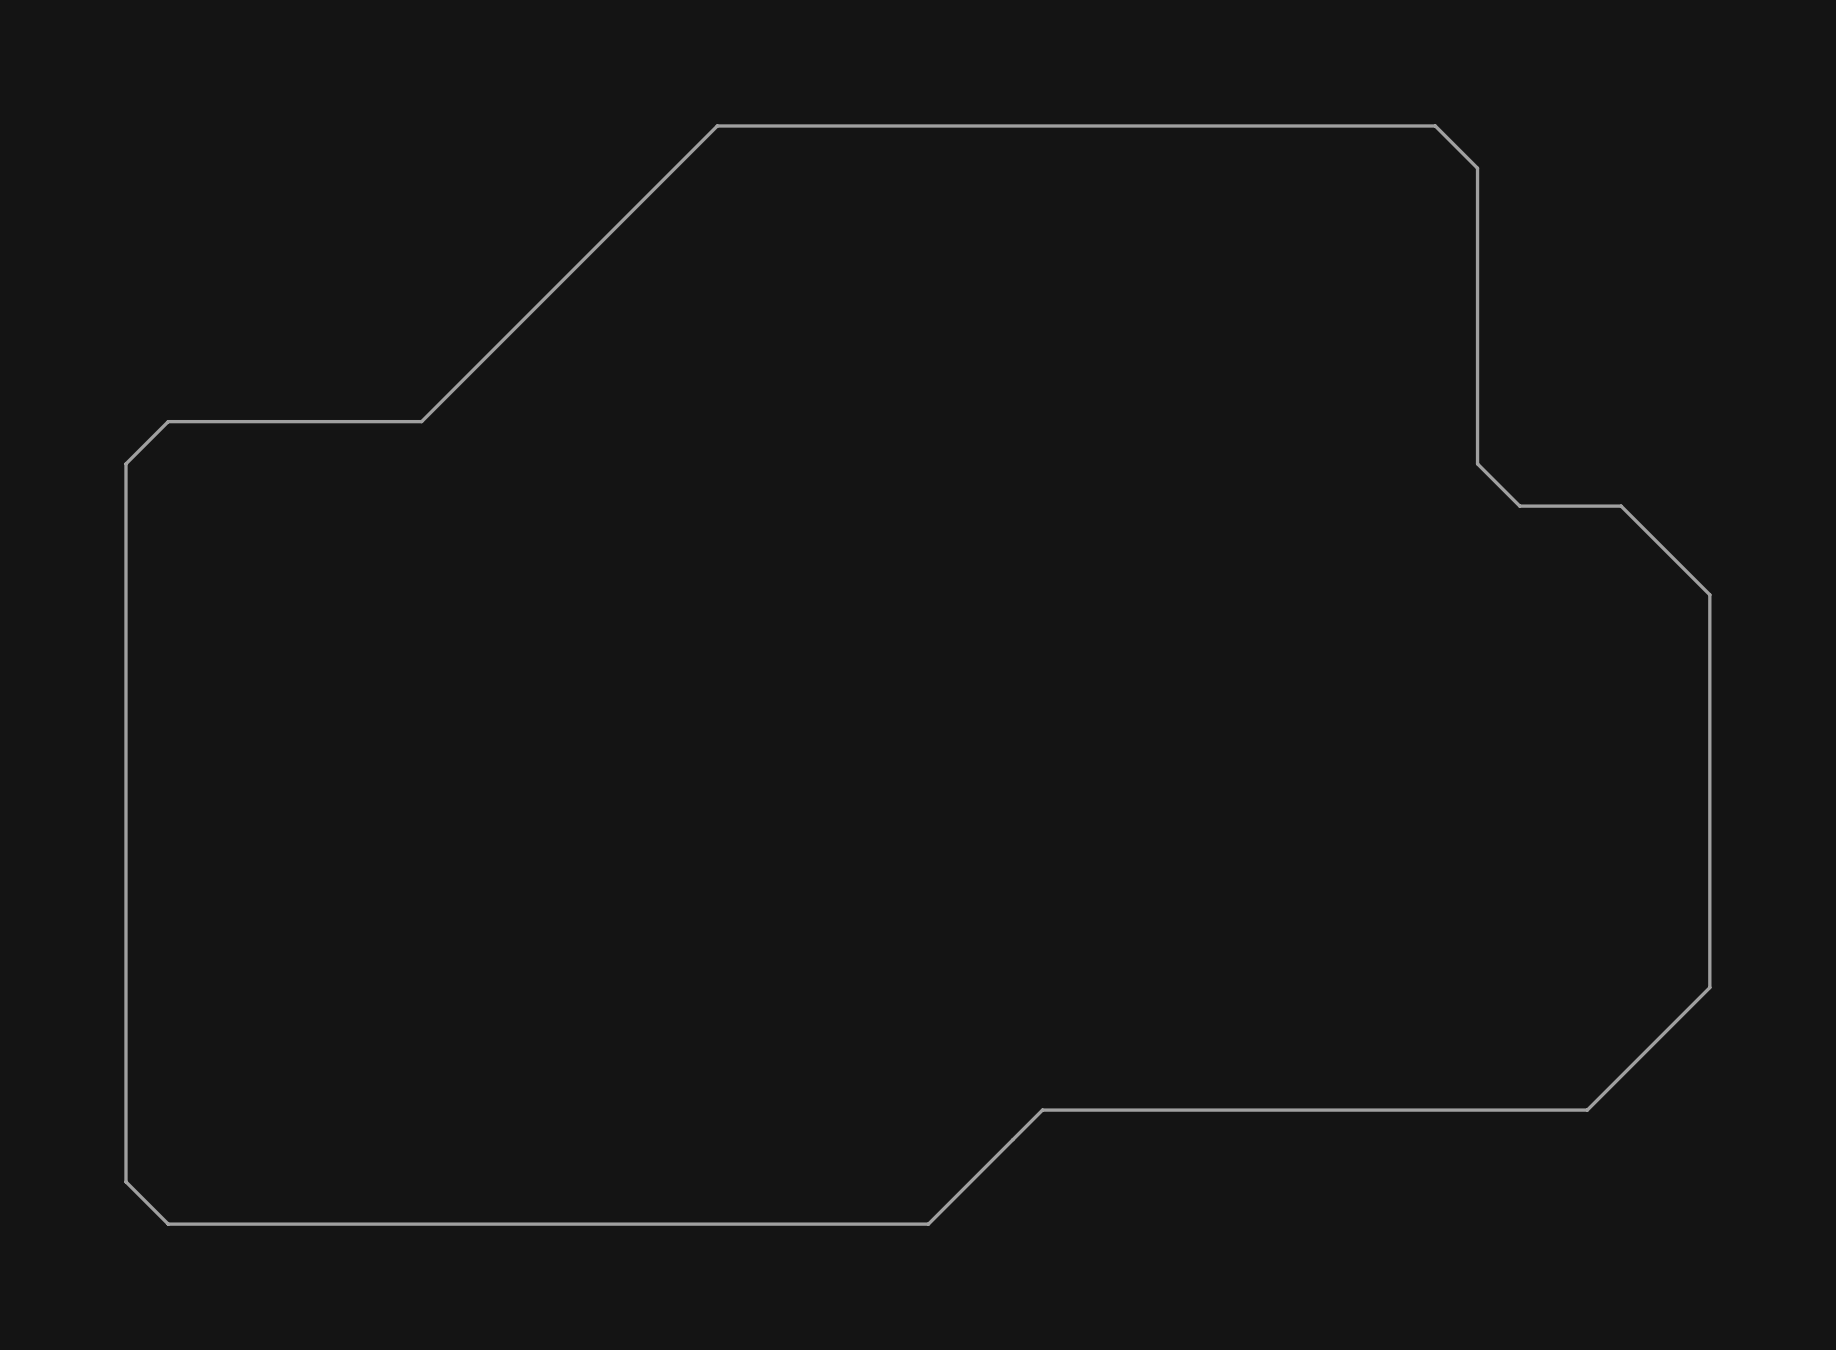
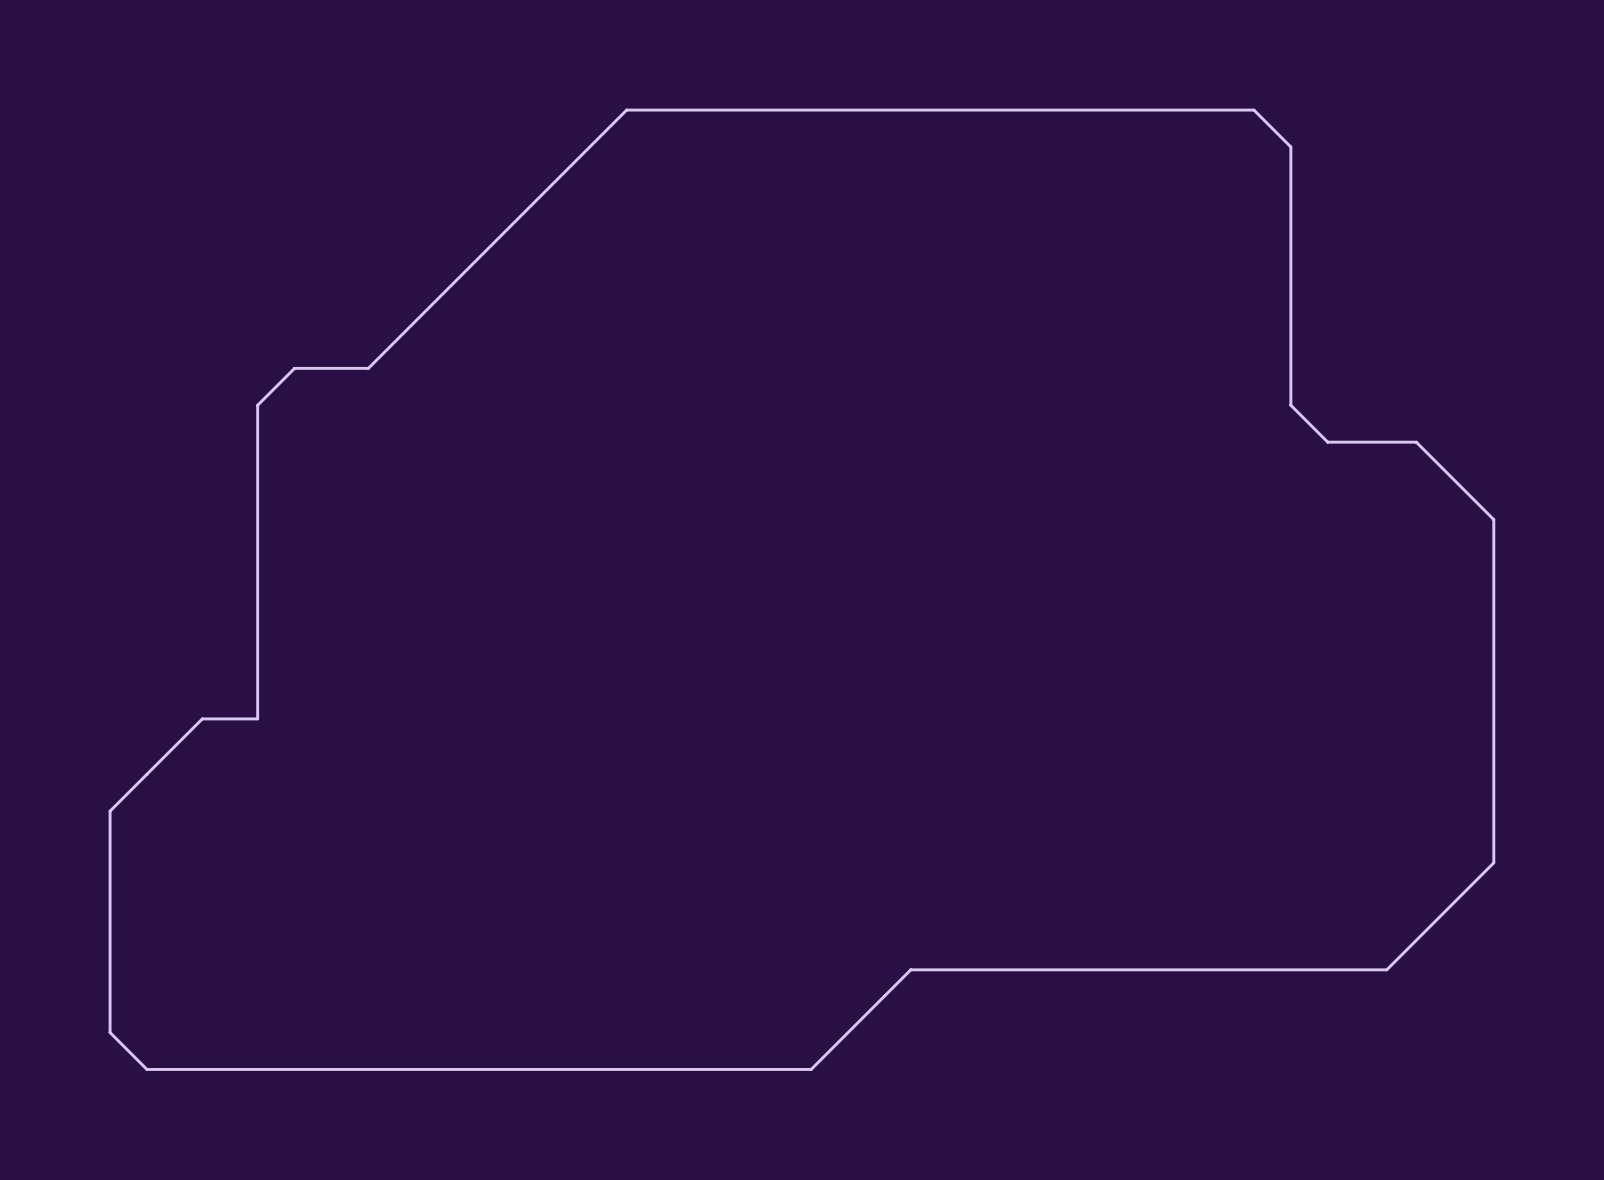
board edge: (337, 421) (168, 421) (125, 463) (125, 928) -> (294, 368) (257, 405) (257, 718) (202, 718) (110, 811)

